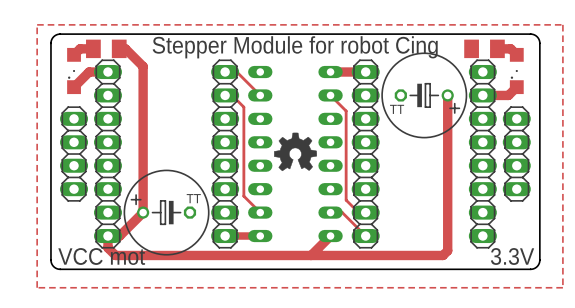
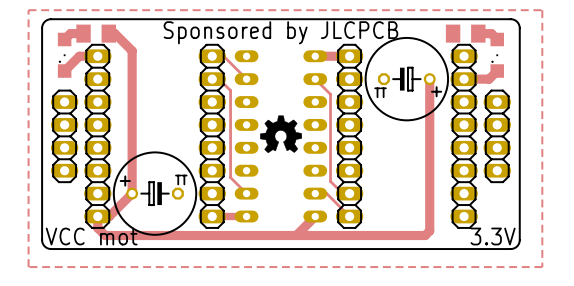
text: Stepper Module for robot Cing (295, 47) -> Sponsored by JLCPCB (280, 32)

